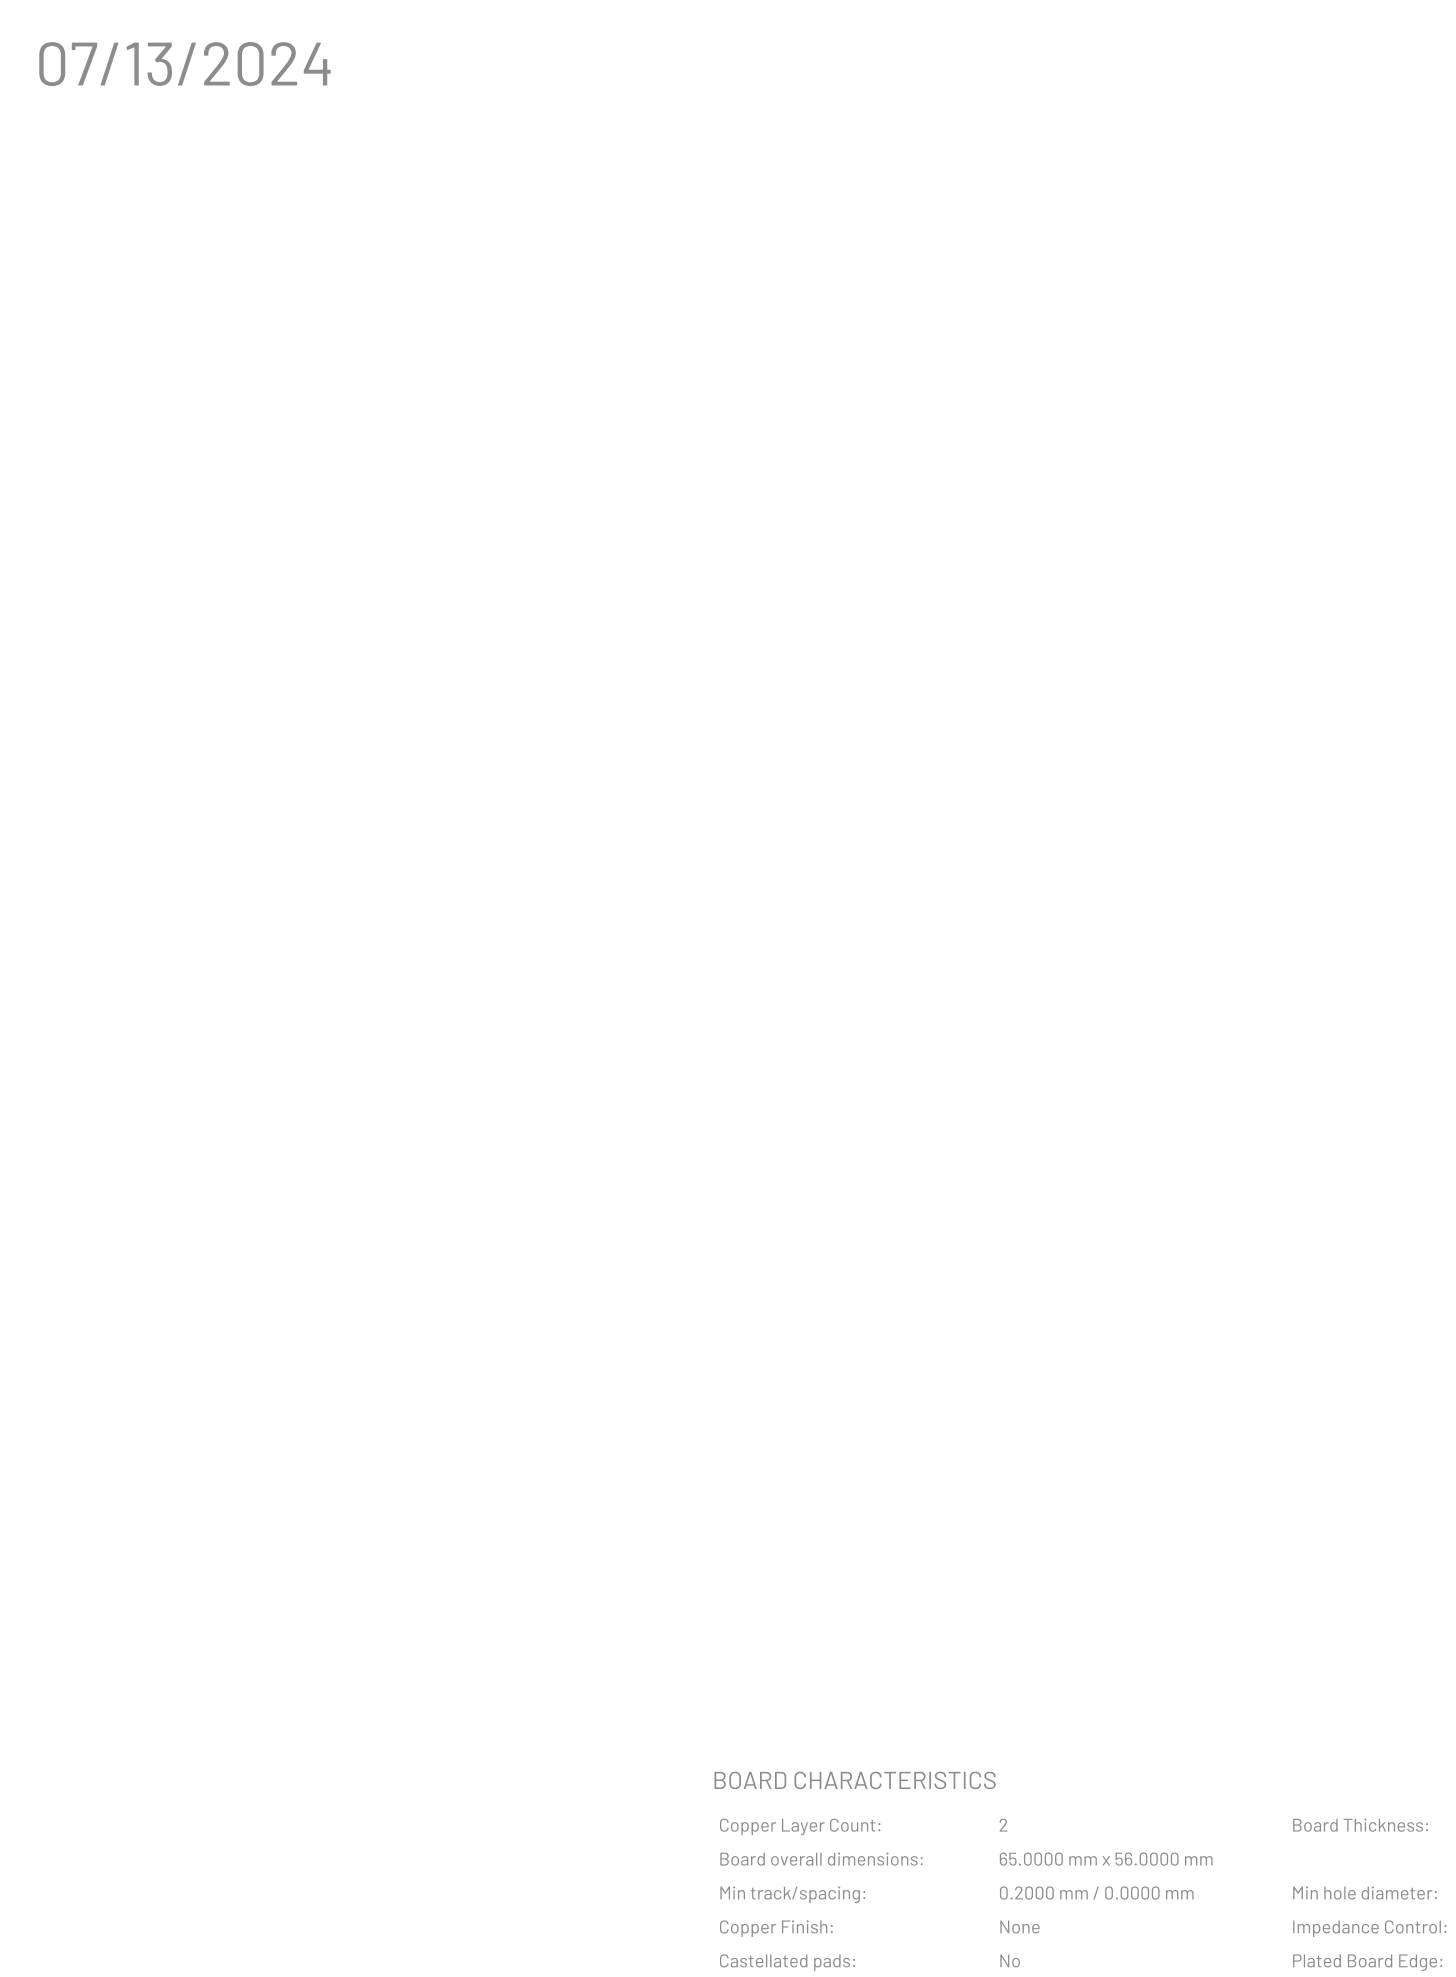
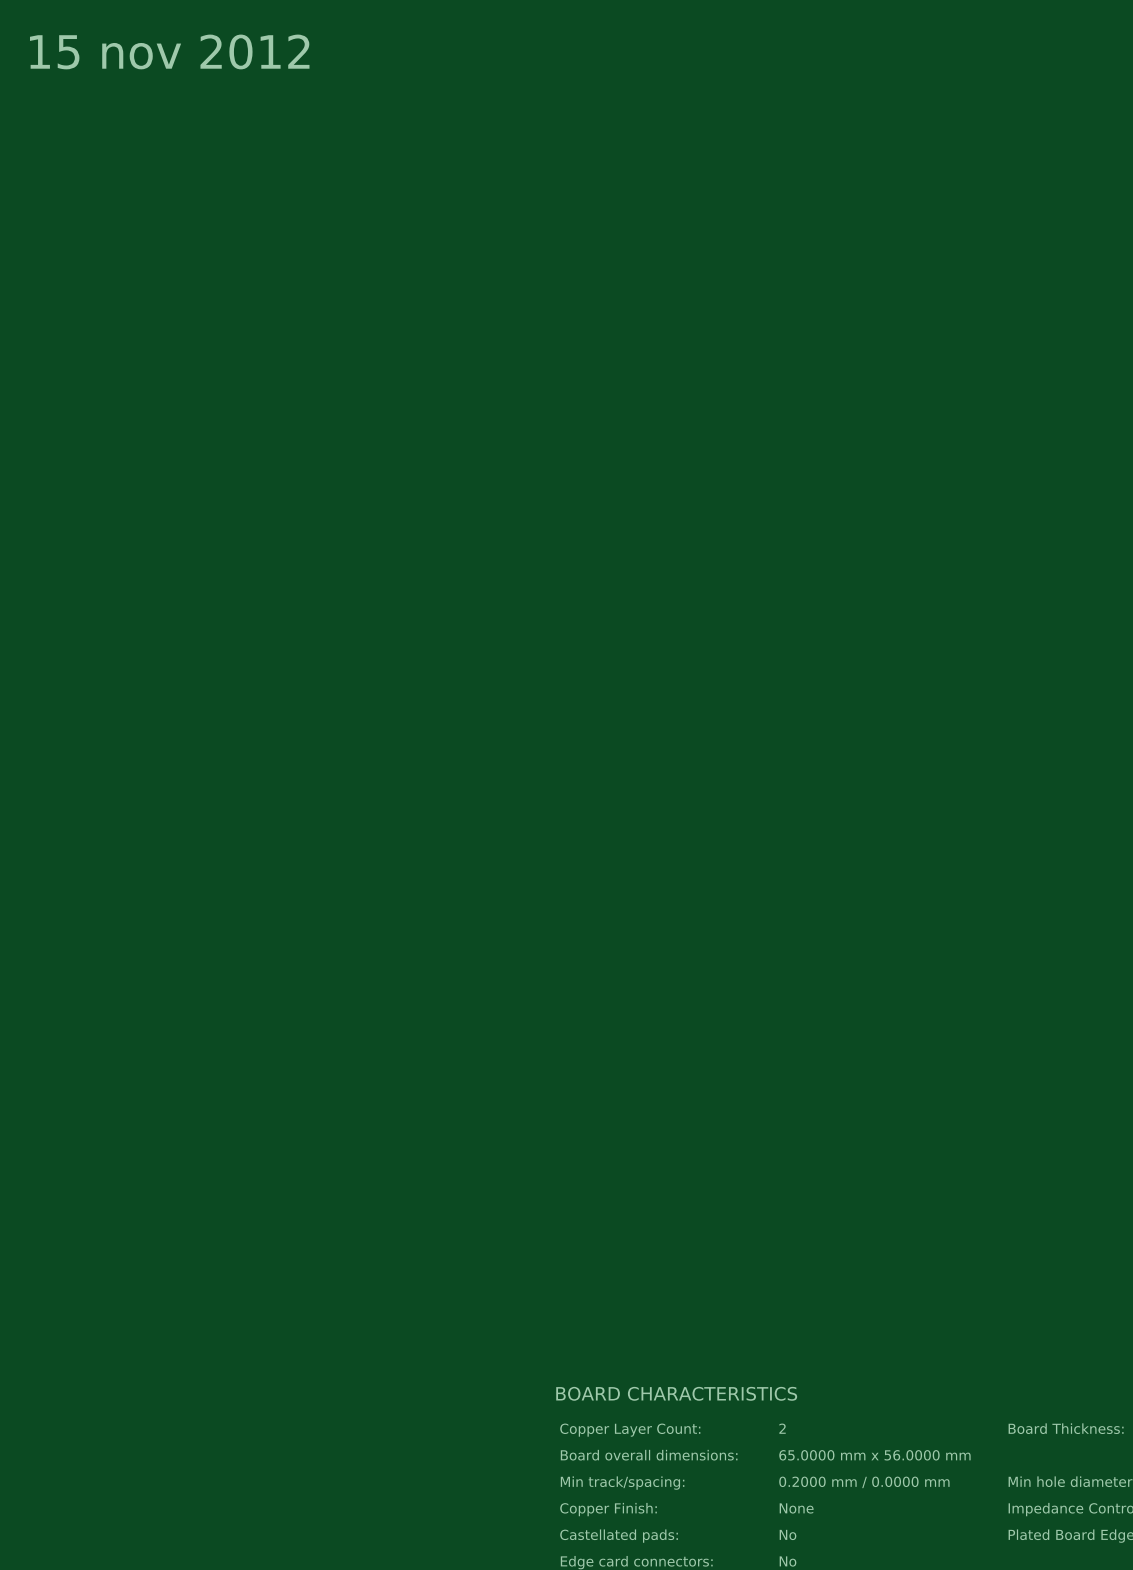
text: 07/13/2024 (185, 64) -> 15 nov 2012 (169, 51)

